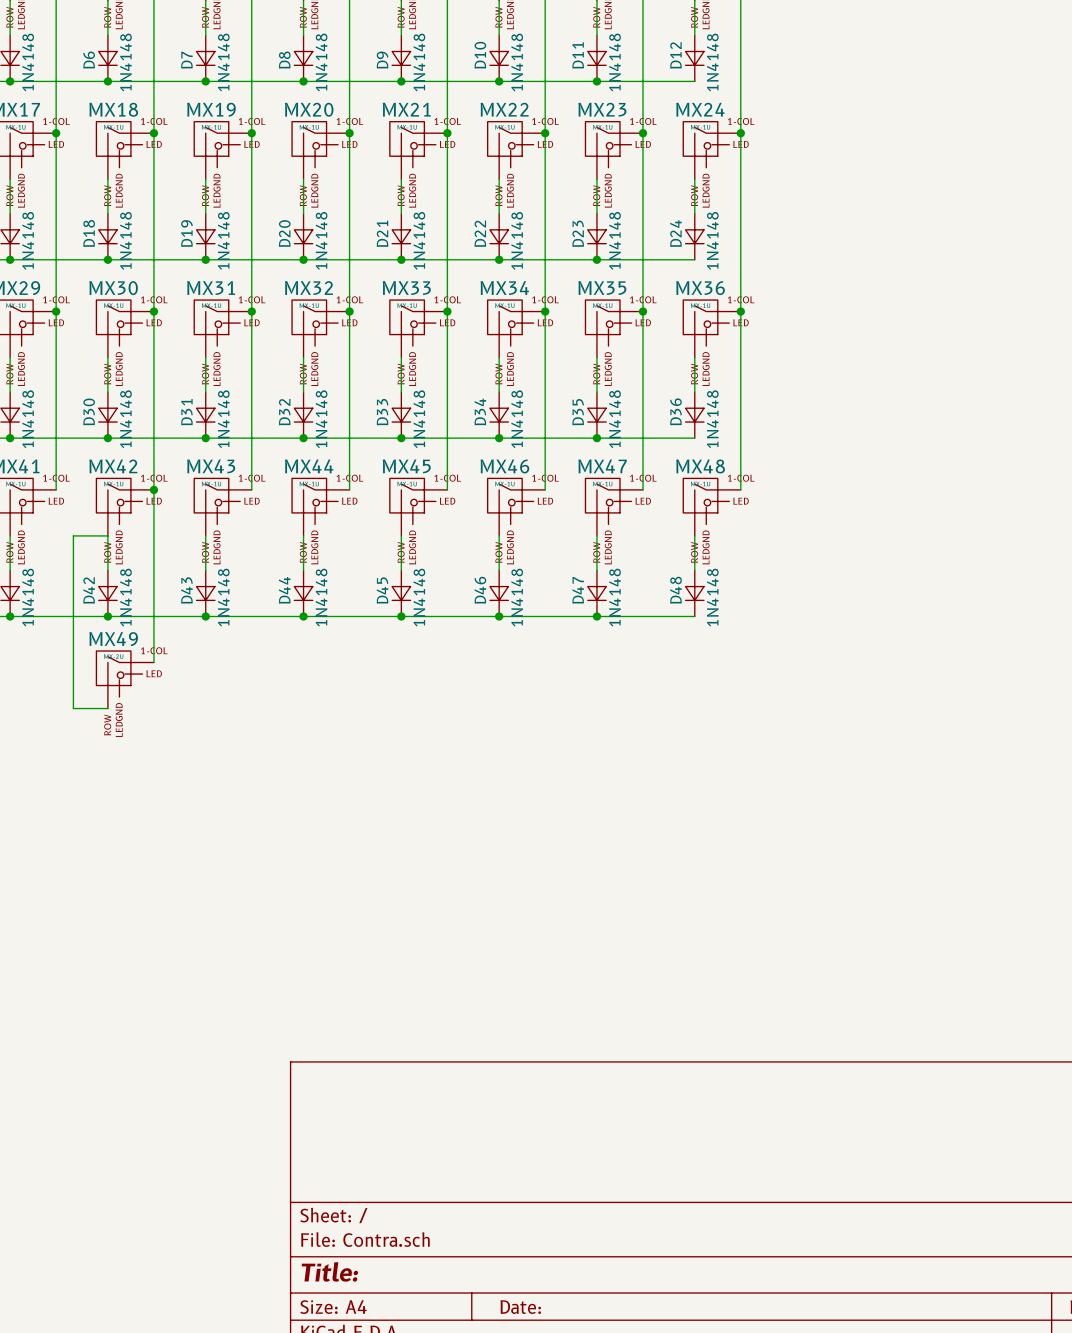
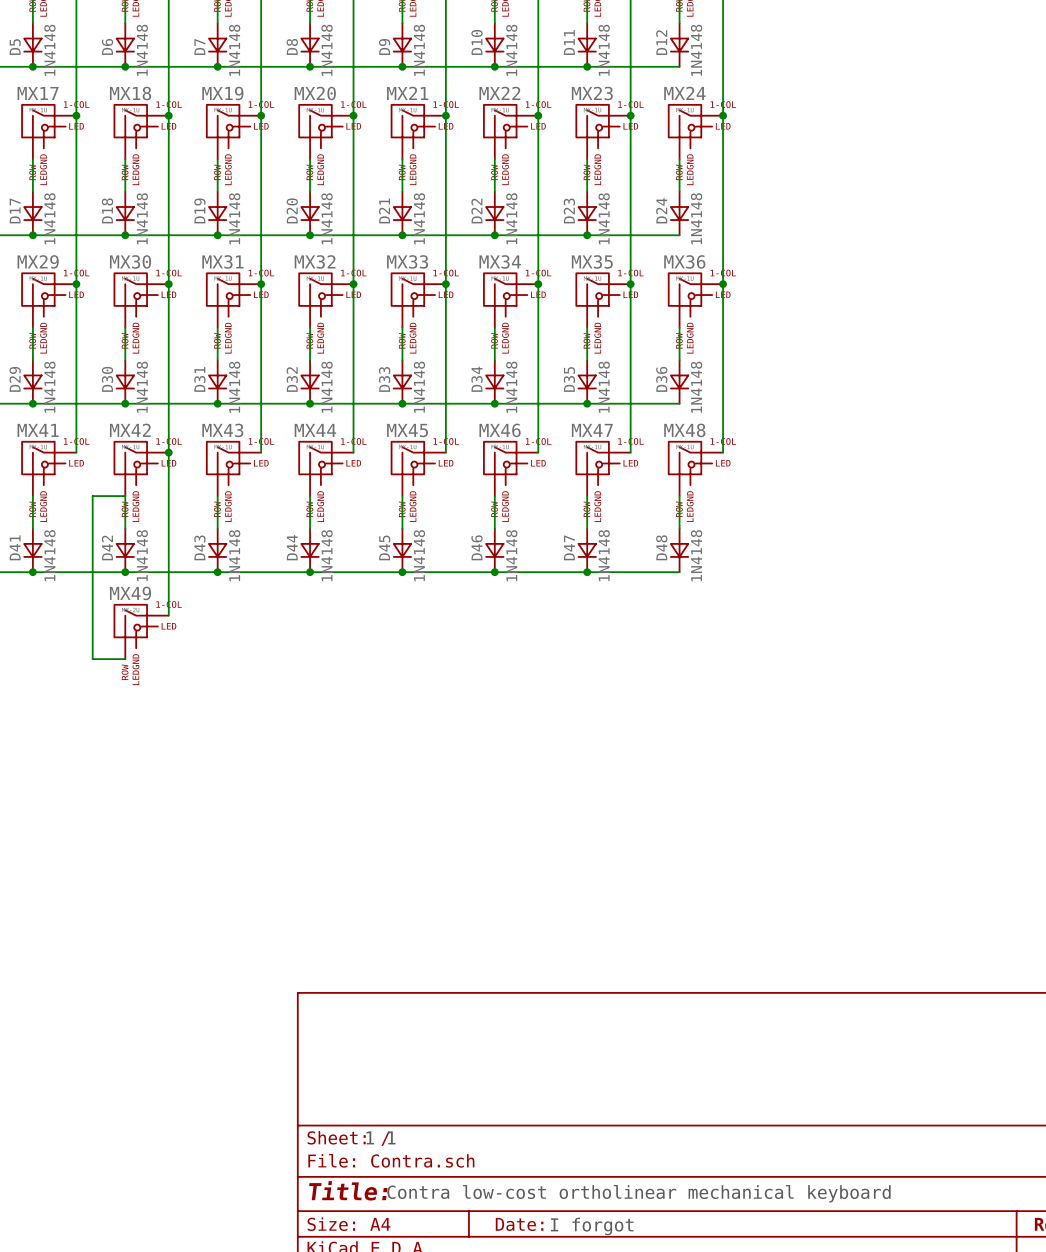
text: none -> 1 1 (381, 1137)
text: none -> Contra low-cost ortholinear mechanical keyboard (638, 1193)
text: none -> I forgot (592, 1226)

